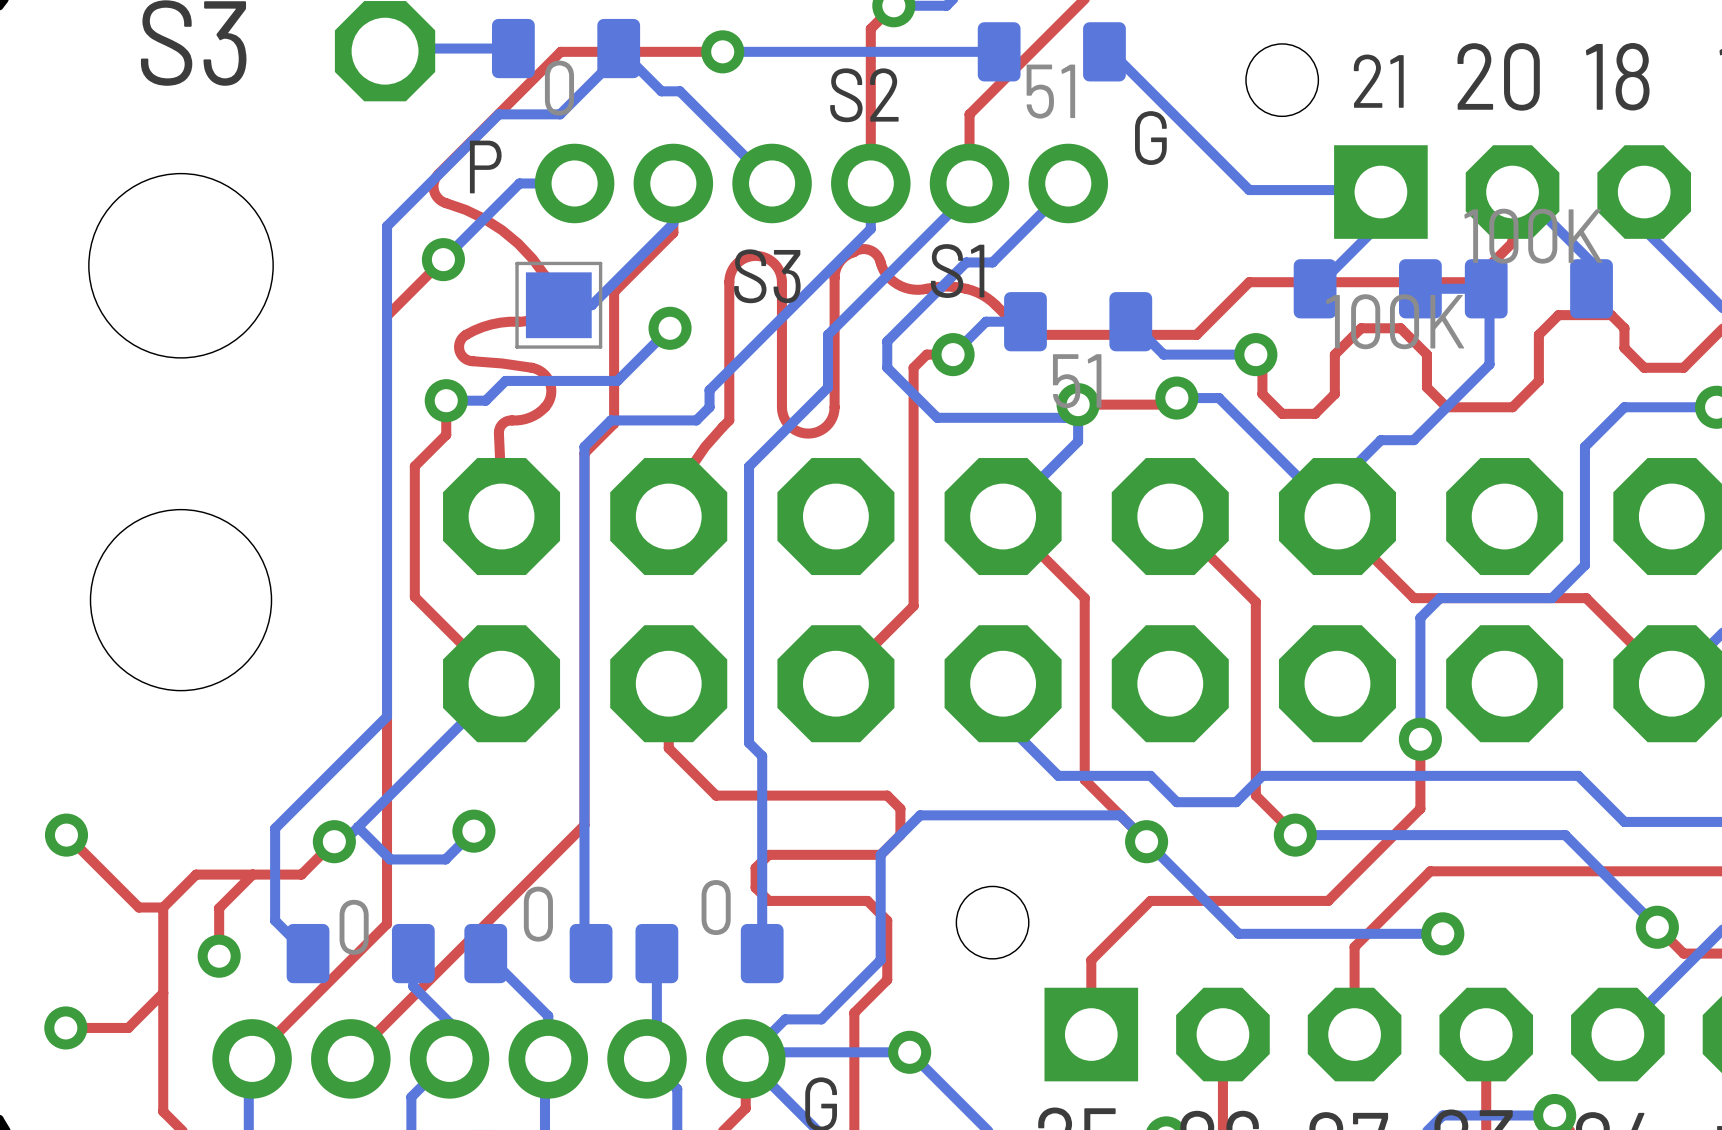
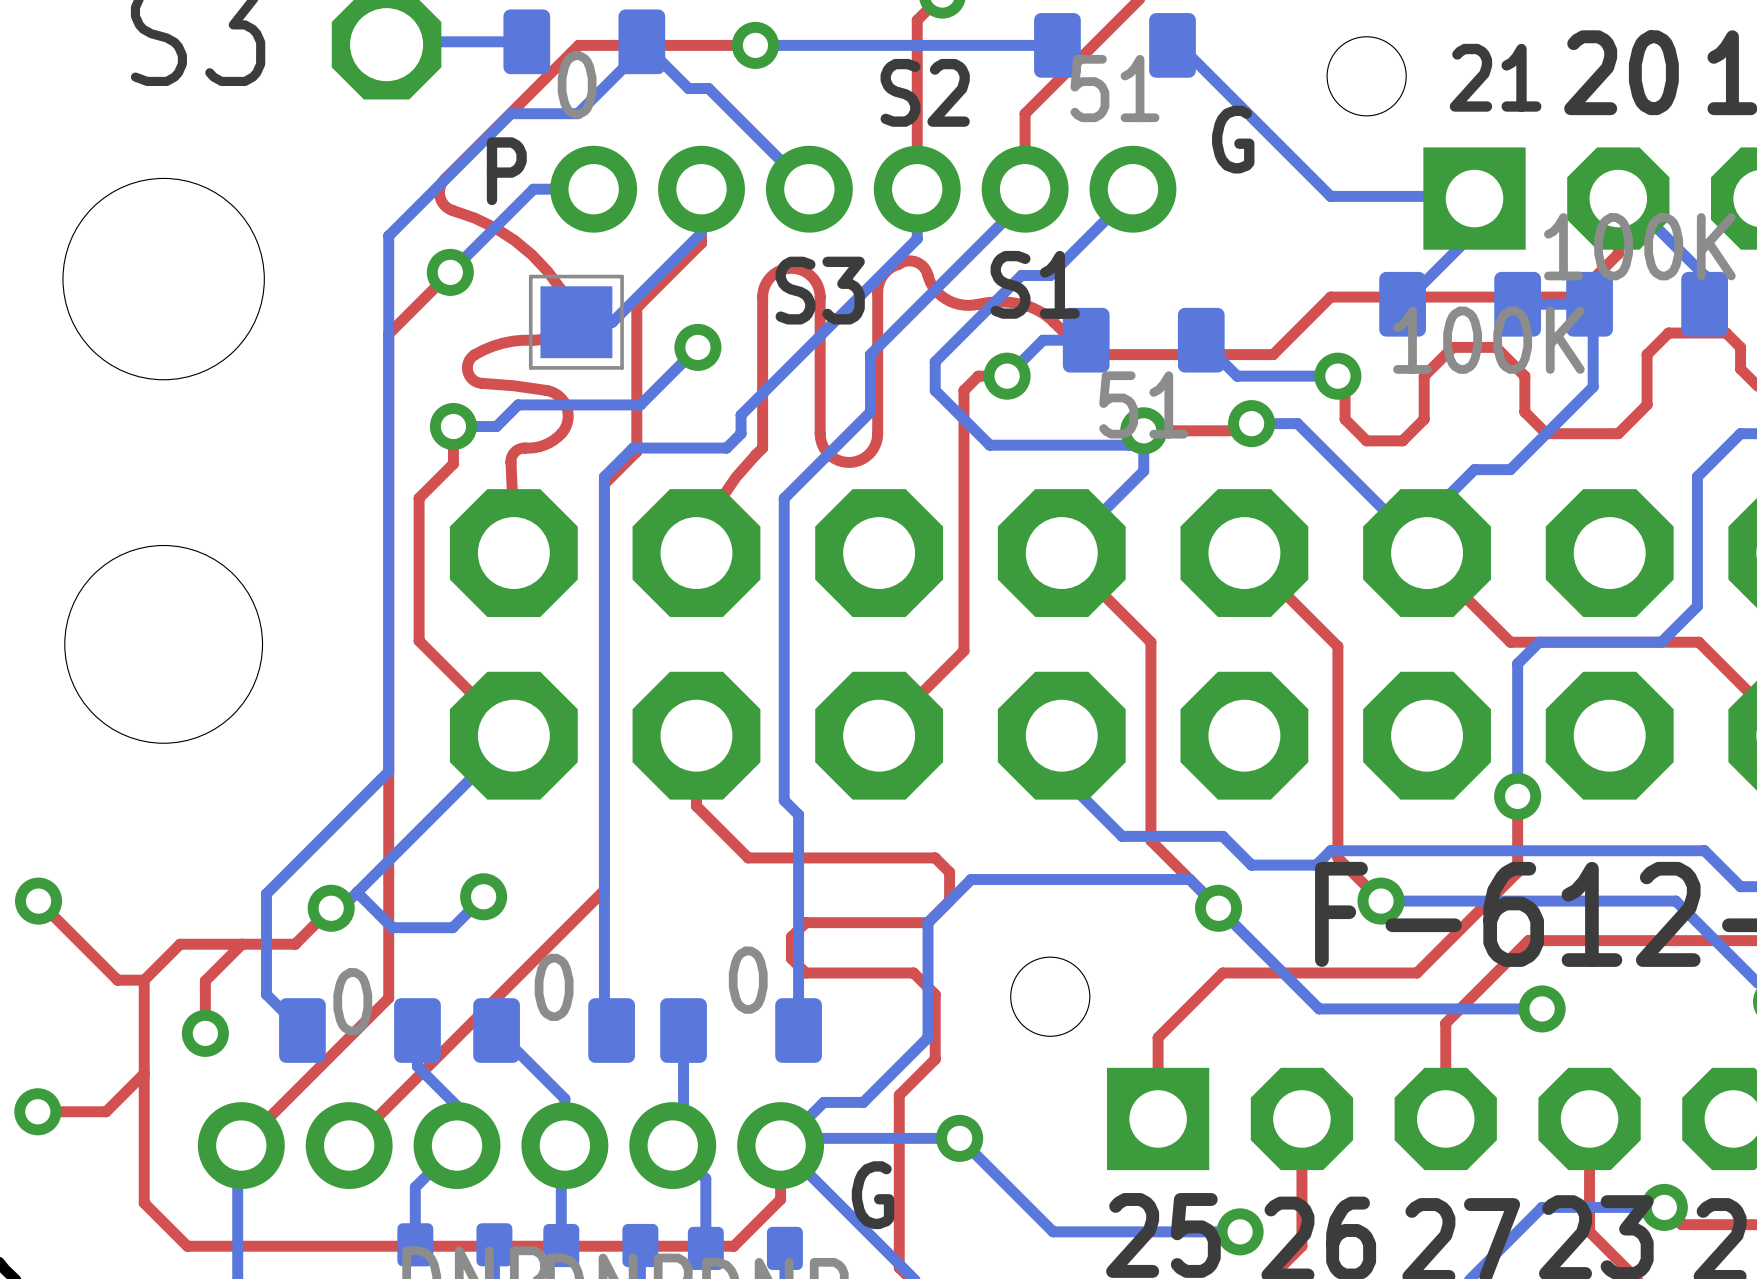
bottom track: (1591, 789) (1578, 775) (1262, 775) (1249, 789) -> (1704, 850) (1330, 850)

